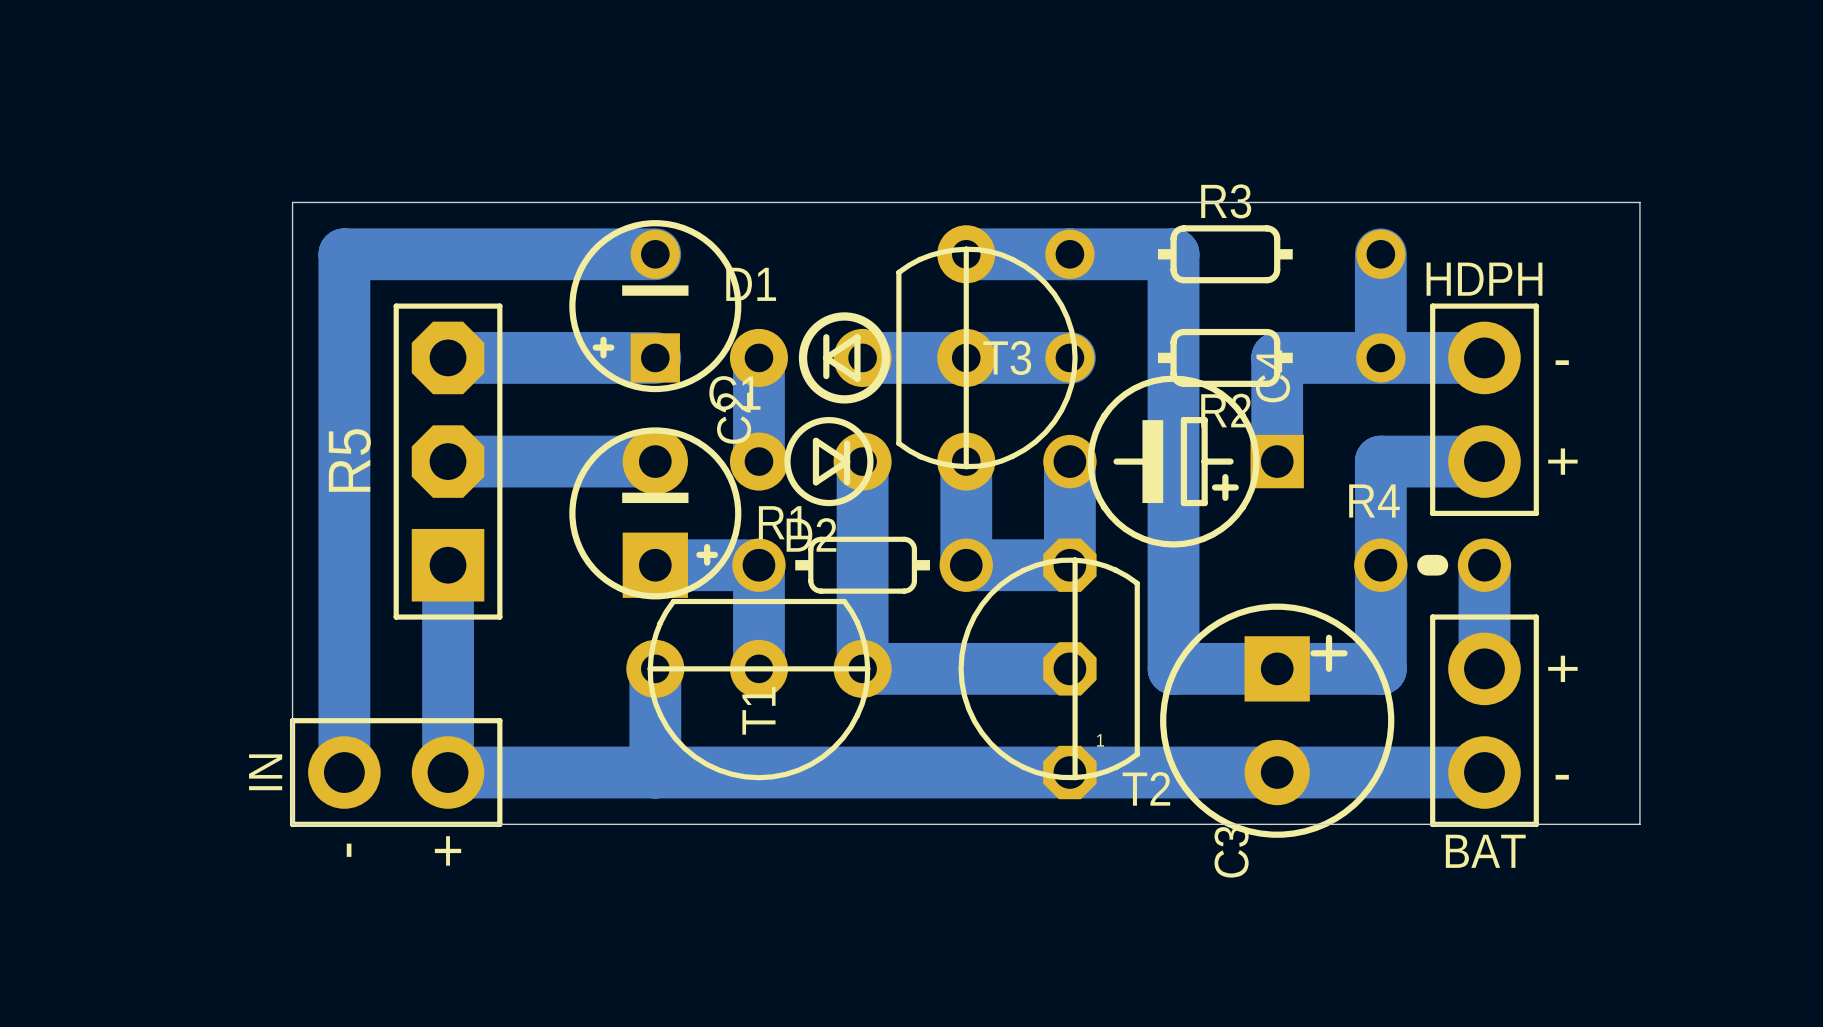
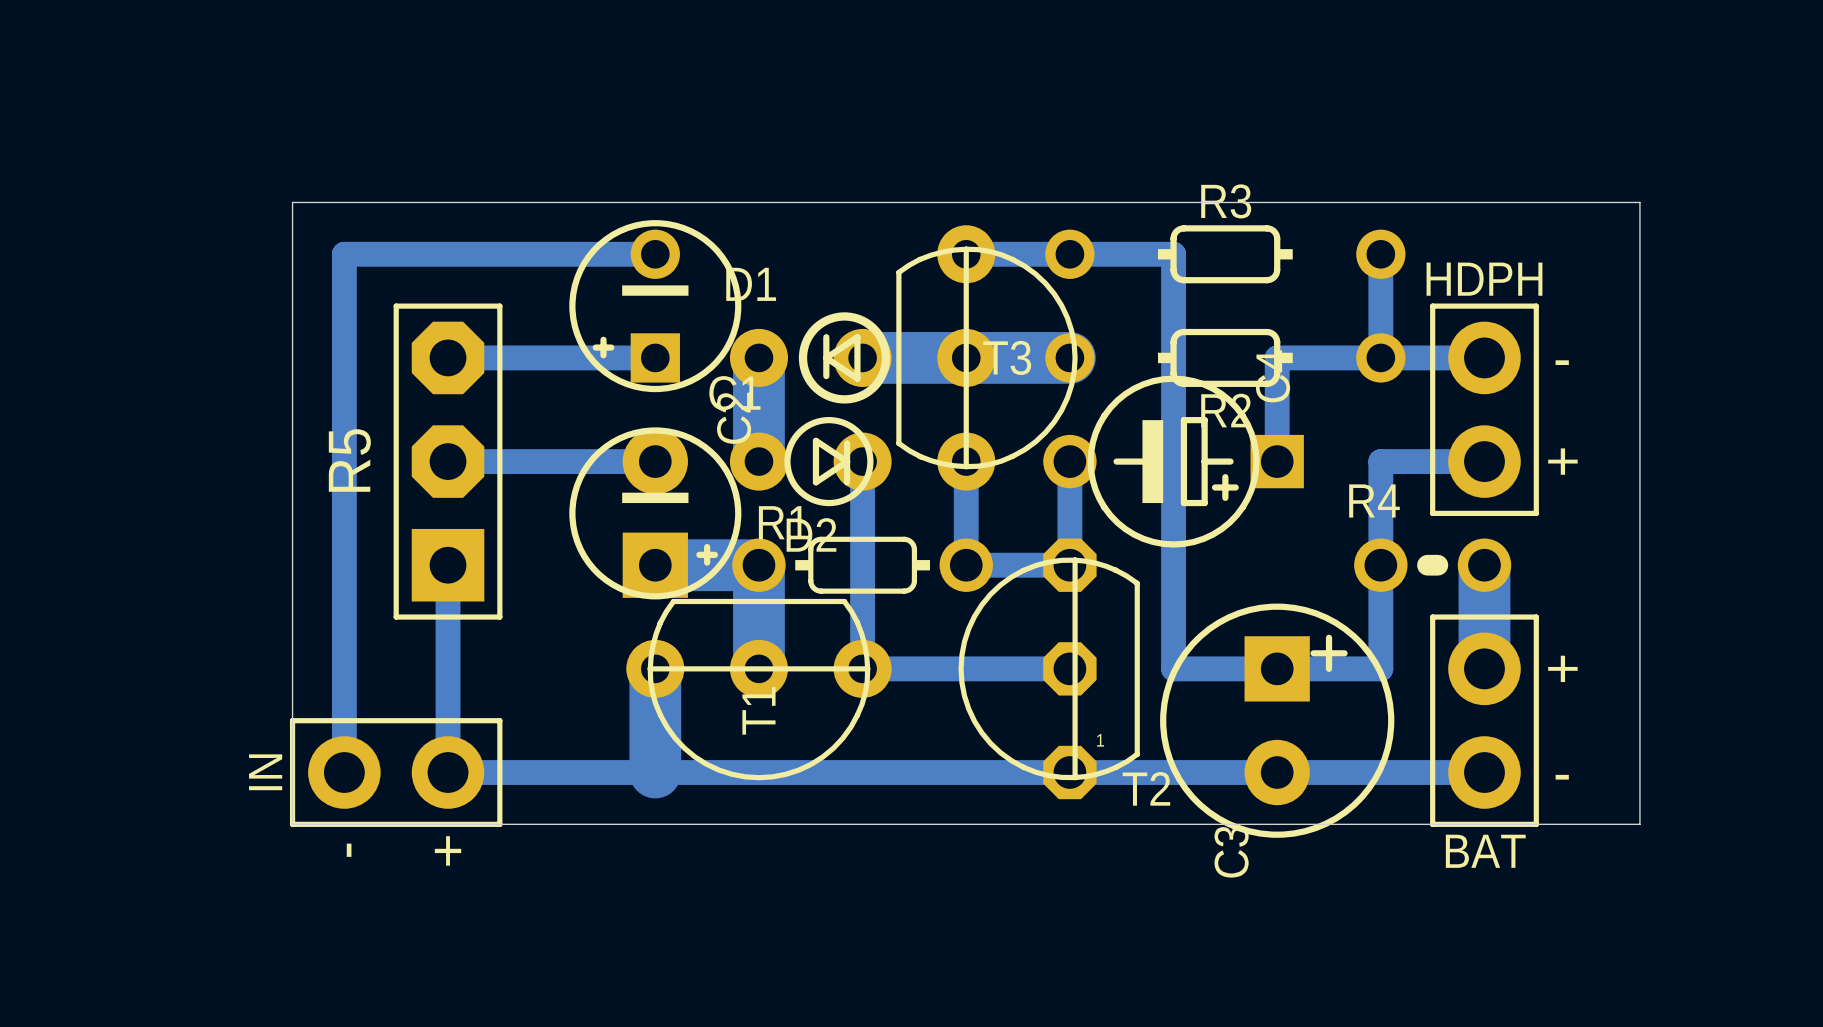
bottom track width: thick (655, 254) (344, 254) (344, 772) -> thin (655, 254) (344, 254) (344, 772)
bottom track width: thick (966, 254) (1173, 254) (1173, 668) (1380, 668) (1380, 461) (1484, 461) -> thin (966, 254) (1173, 254) (1173, 668) (1380, 668) (1380, 461) (1484, 461)
bottom track width: thick (1380, 254) (1380, 357) -> thin (1380, 254) (1380, 357)
bottom track width: thick (448, 357) (655, 357) -> thin (448, 357) (655, 357)
bottom track width: thick (1484, 357) (1277, 357) (1277, 461) -> thin (1484, 357) (1277, 357) (1277, 461)
bottom track width: thick (448, 461) (655, 461) -> thin (448, 461) (655, 461)
bottom track width: thick (862, 461) (862, 668) (1069, 668) -> thin (862, 461) (862, 668) (1069, 668)
bottom track width: thick (966, 461) (966, 565) (1069, 565) (1069, 461) -> thin (966, 461) (966, 565) (1069, 565) (1069, 461)
bottom track width: thick (448, 565) (448, 772) (1484, 772) -> thin (448, 565) (448, 772) (1484, 772)

